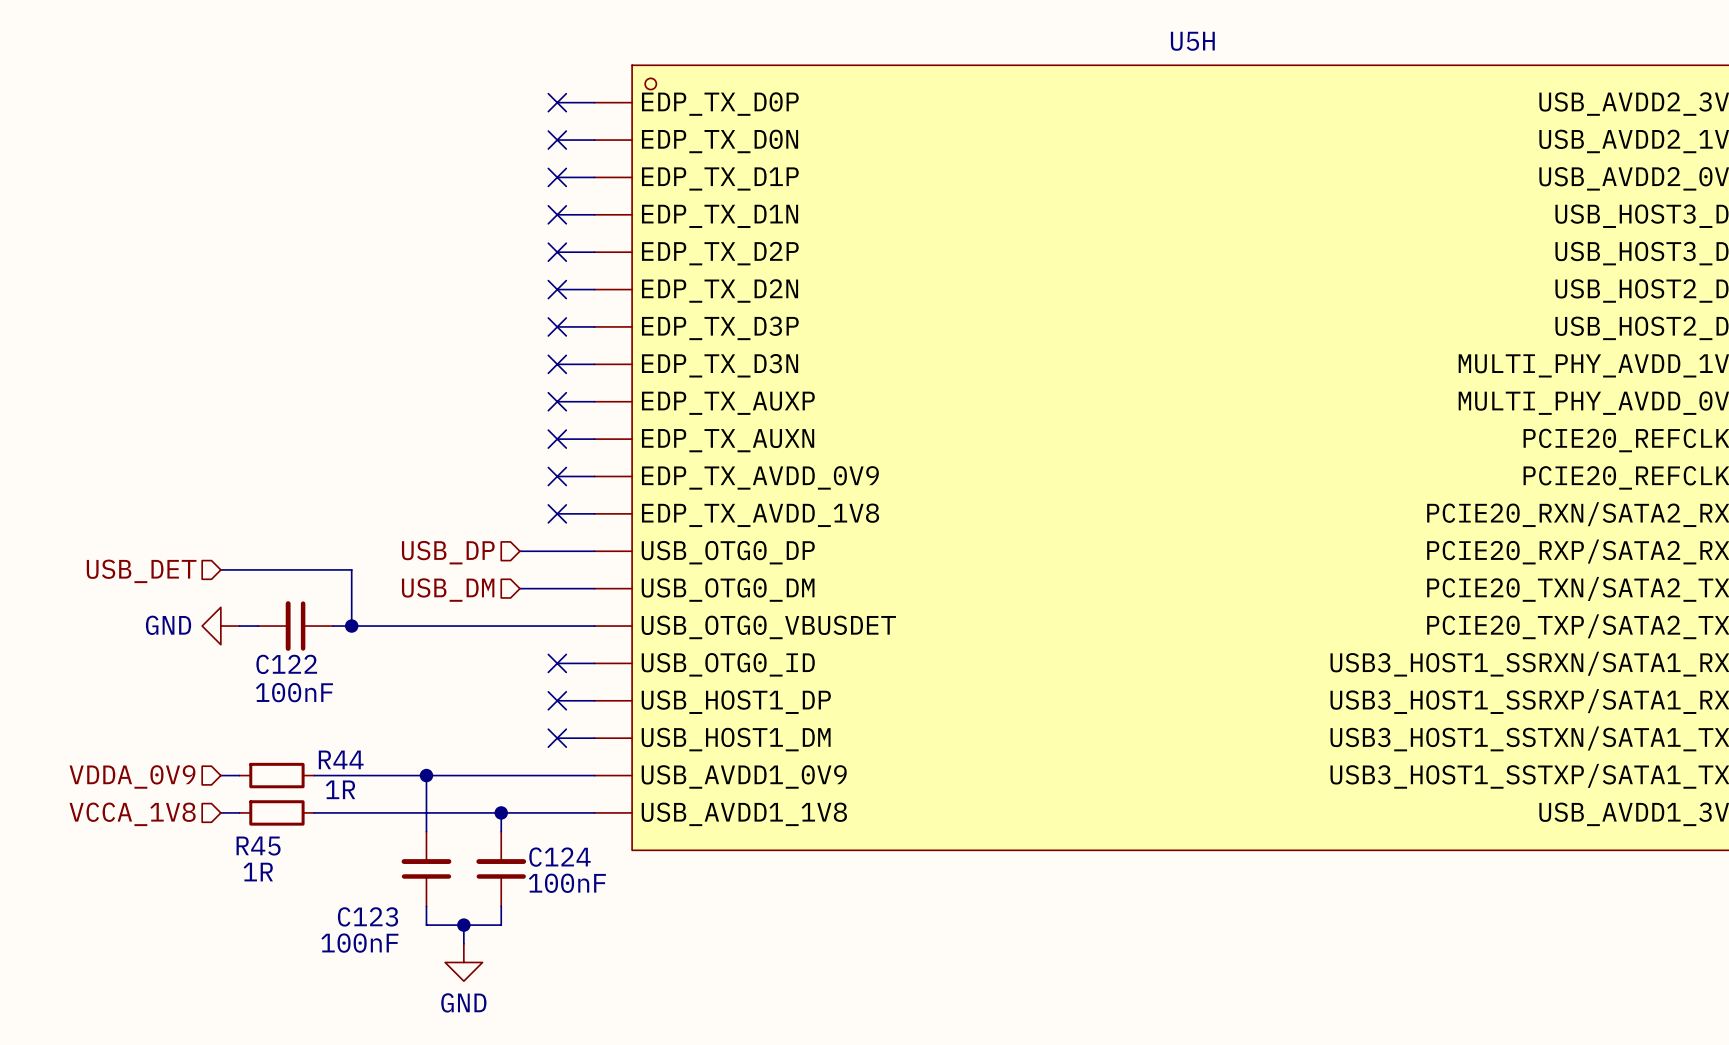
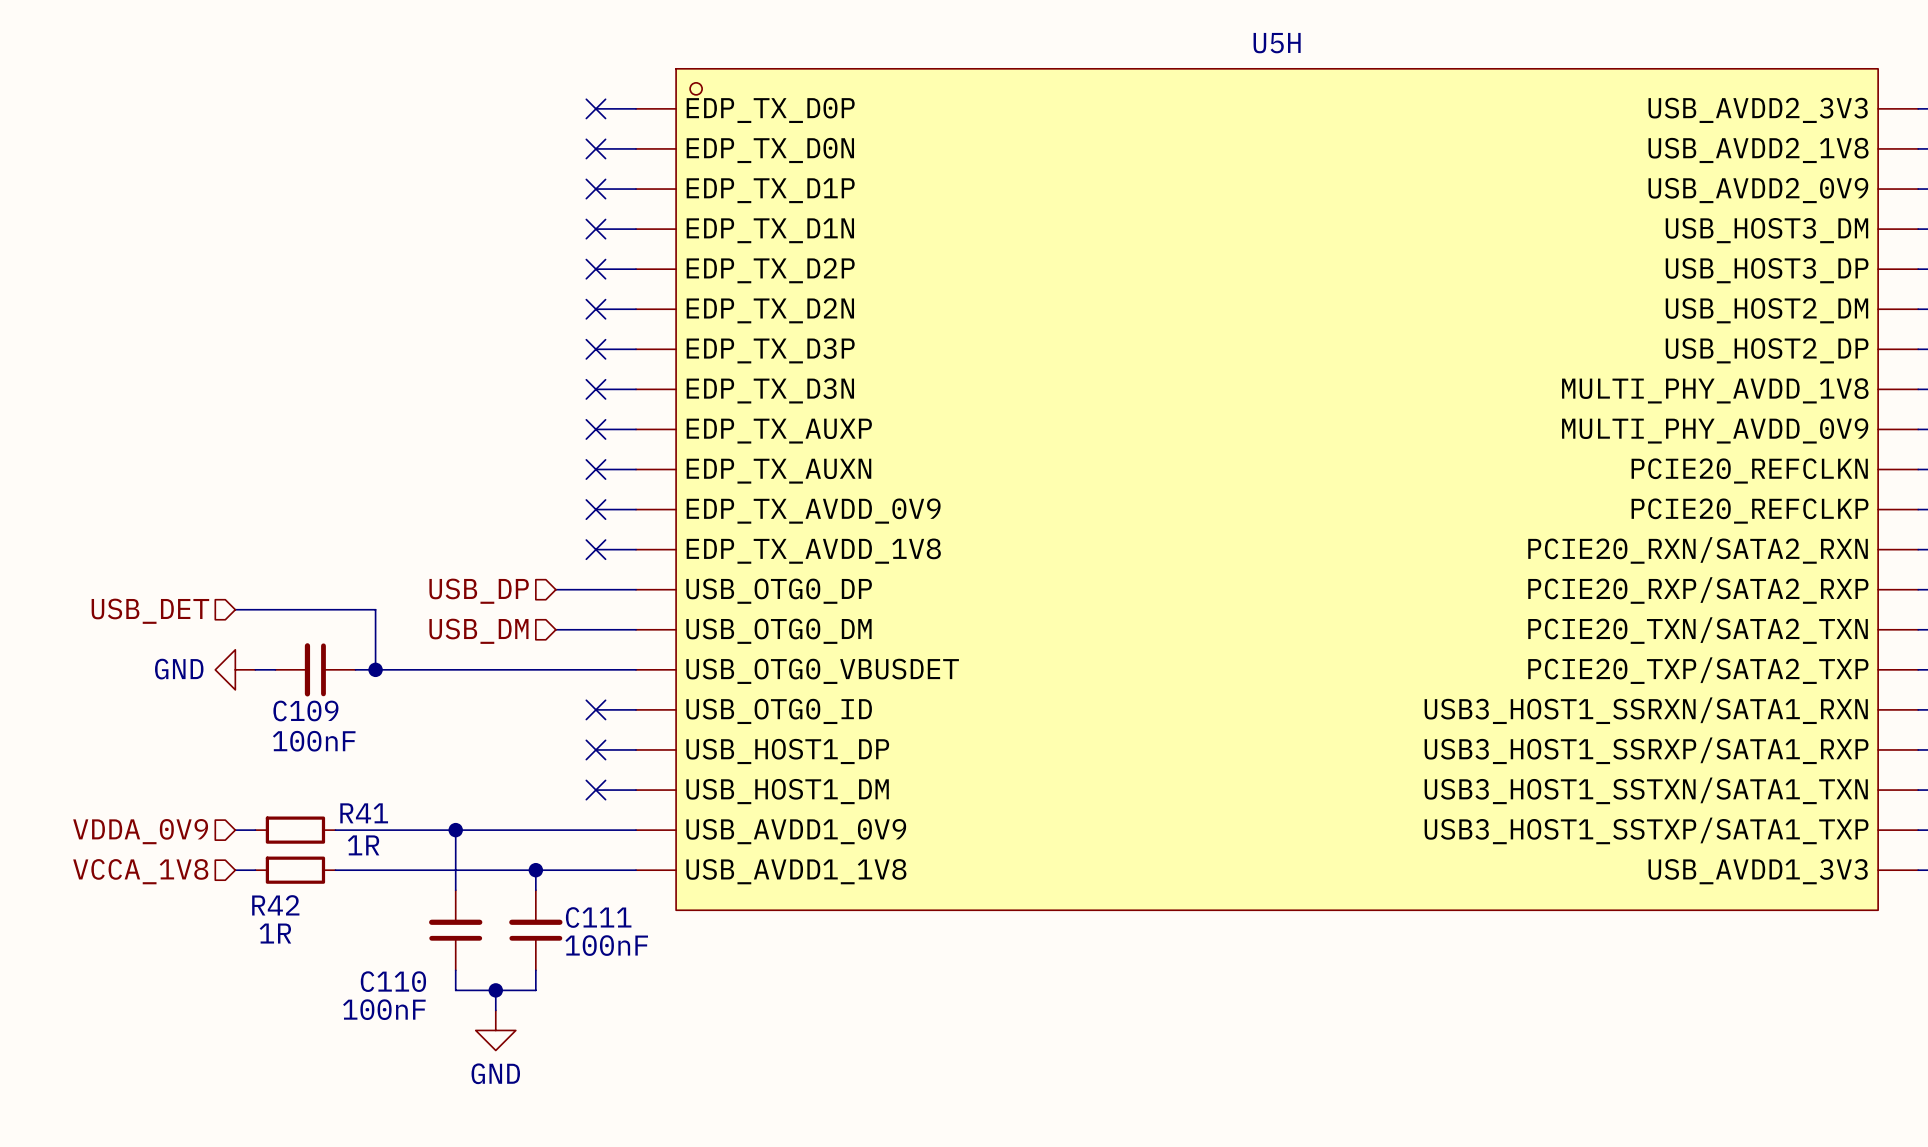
C122 name: C122 (286, 664) -> C109 (305, 710)
R44 name: R44 (341, 759) -> R41 (364, 813)
R45 name: R45 (258, 846) -> R42 (275, 905)
C124 name: C124 (559, 857) -> C111 (598, 917)
C123 name: C123 (368, 916) -> C110 (393, 981)

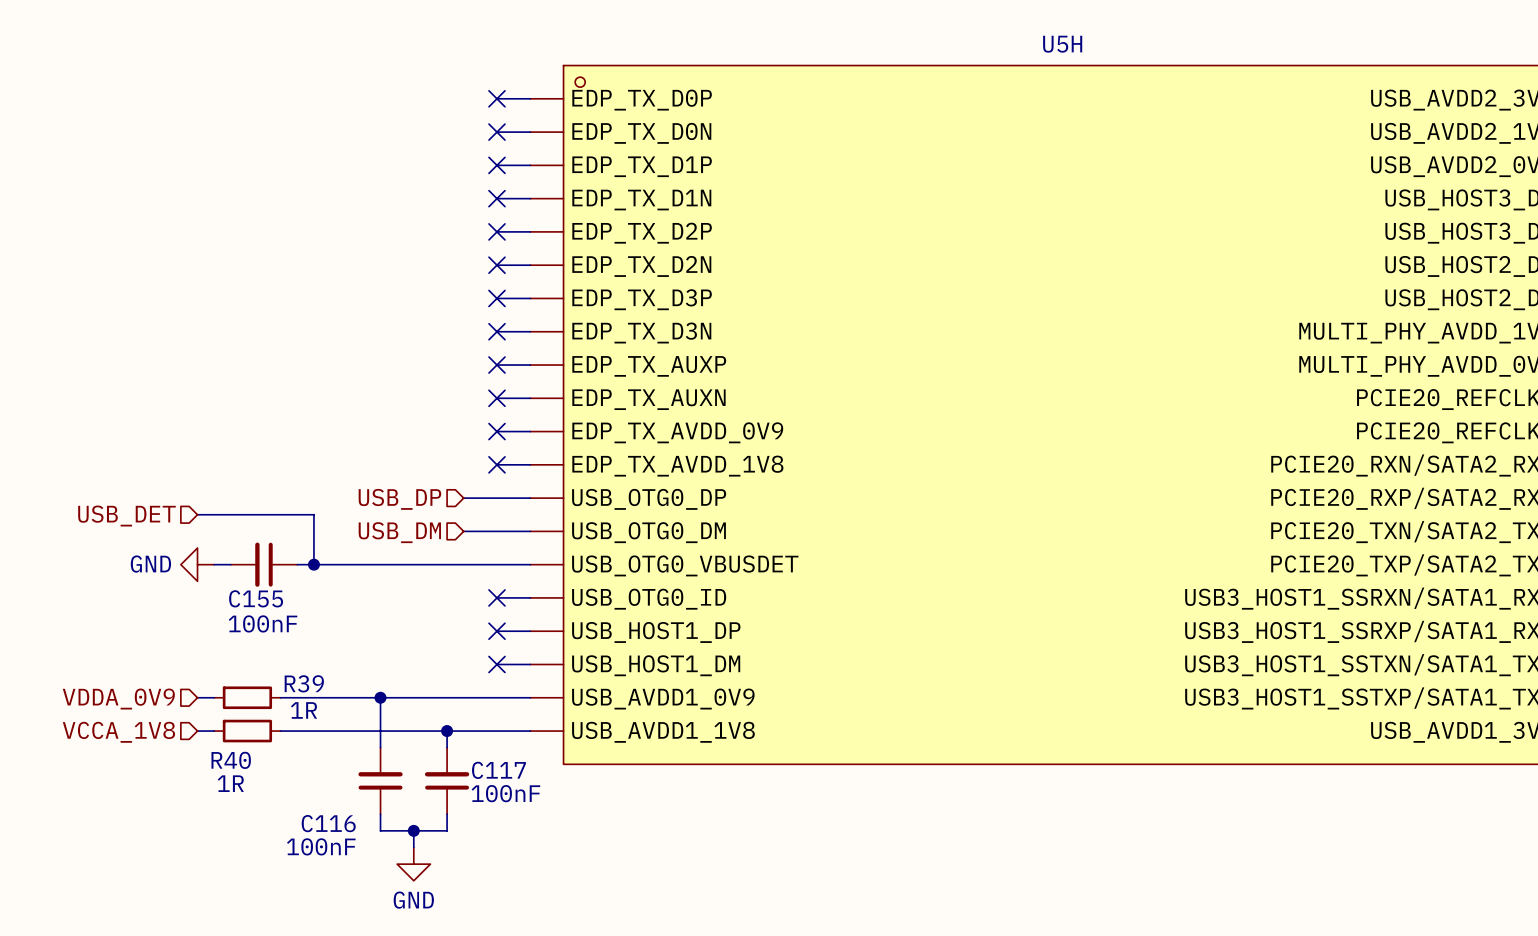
C109 name: C109 (305, 710) -> C155 (256, 598)
R41 name: R41 (364, 813) -> R39 (304, 683)
R42 name: R42 (275, 905) -> R40 (231, 760)
C111 name: C111 (598, 917) -> C117 (498, 770)
C110 name: C110 (393, 981) -> C116 (328, 823)

